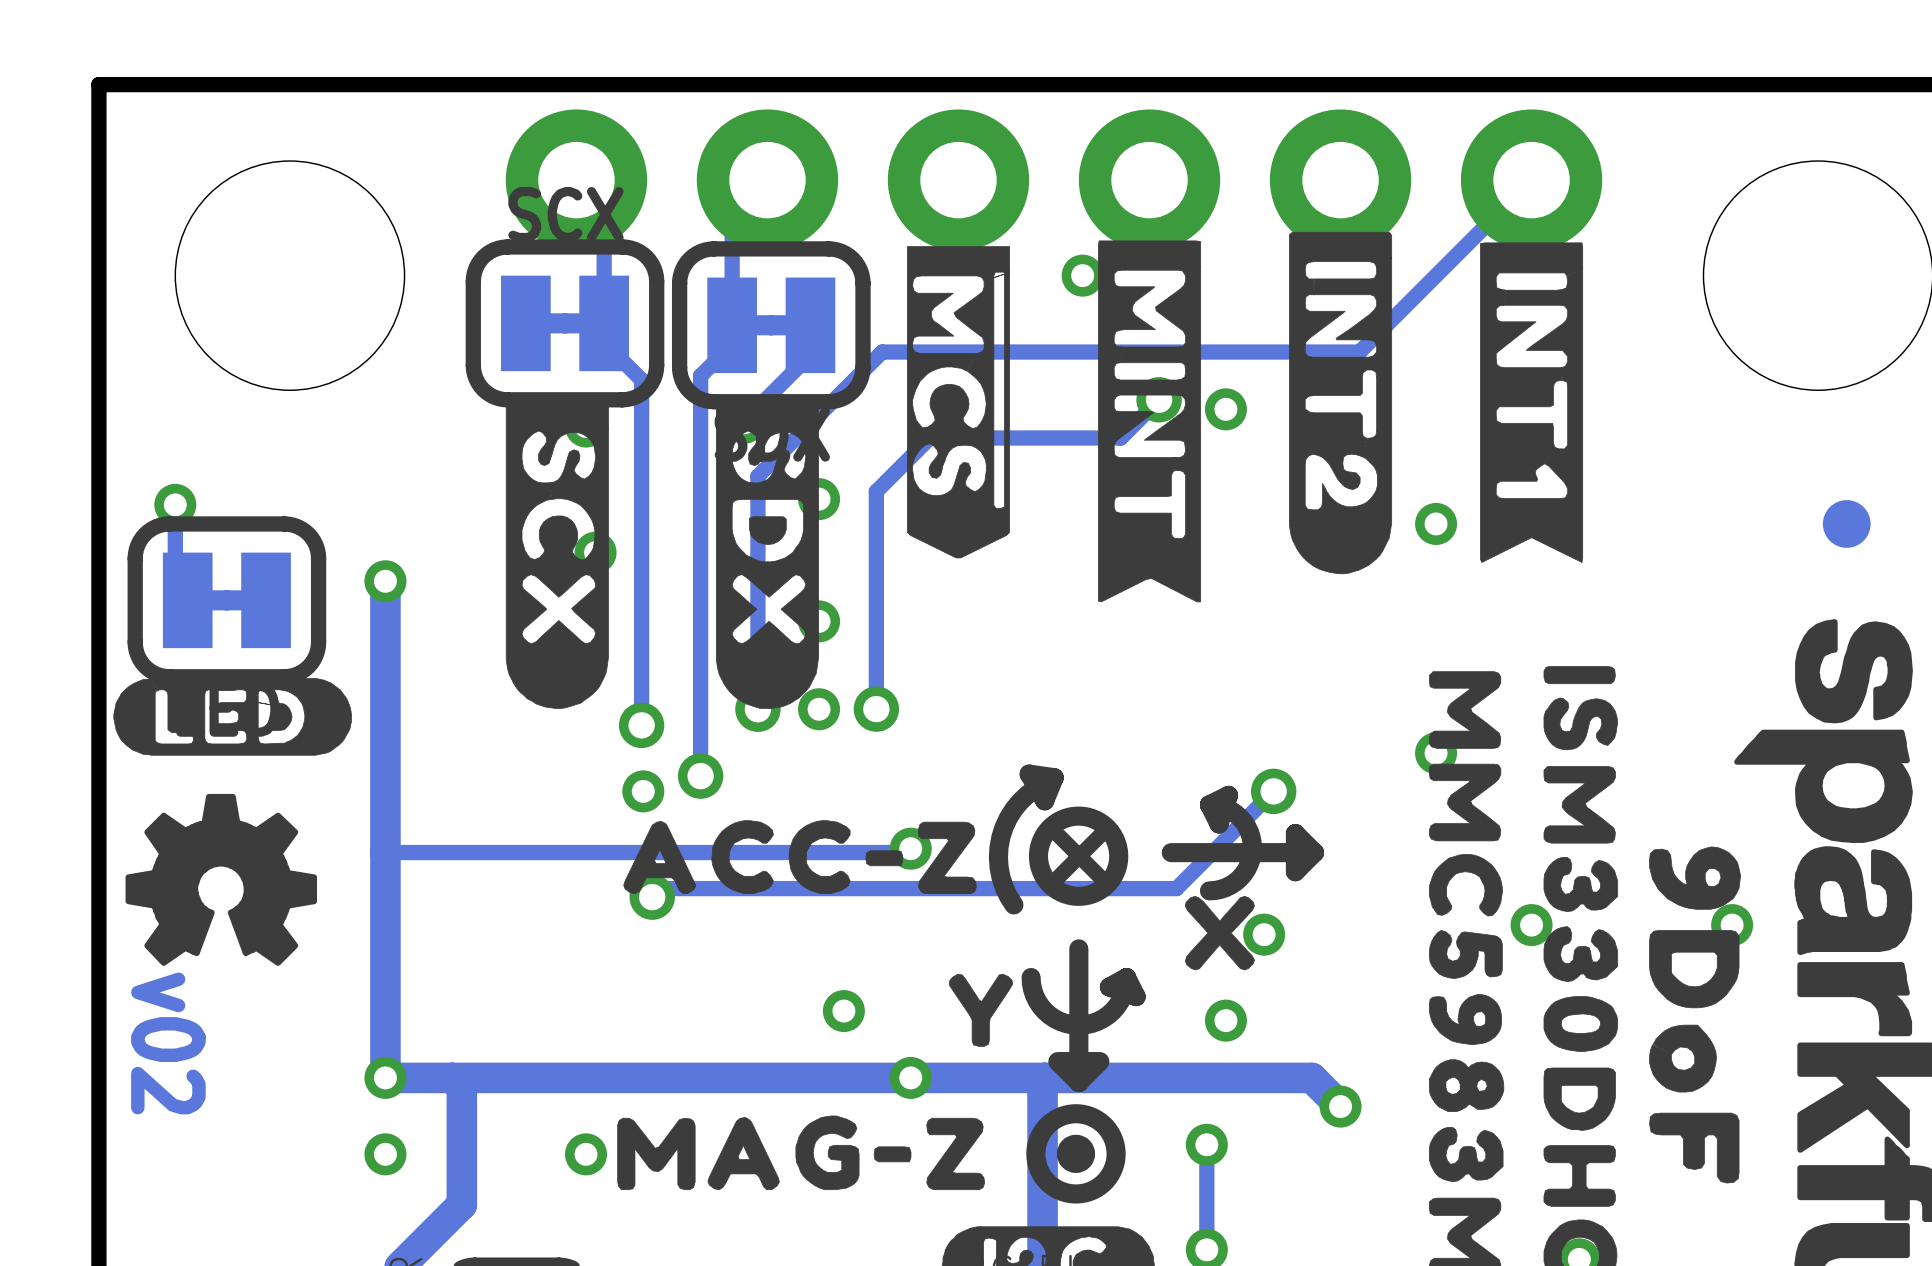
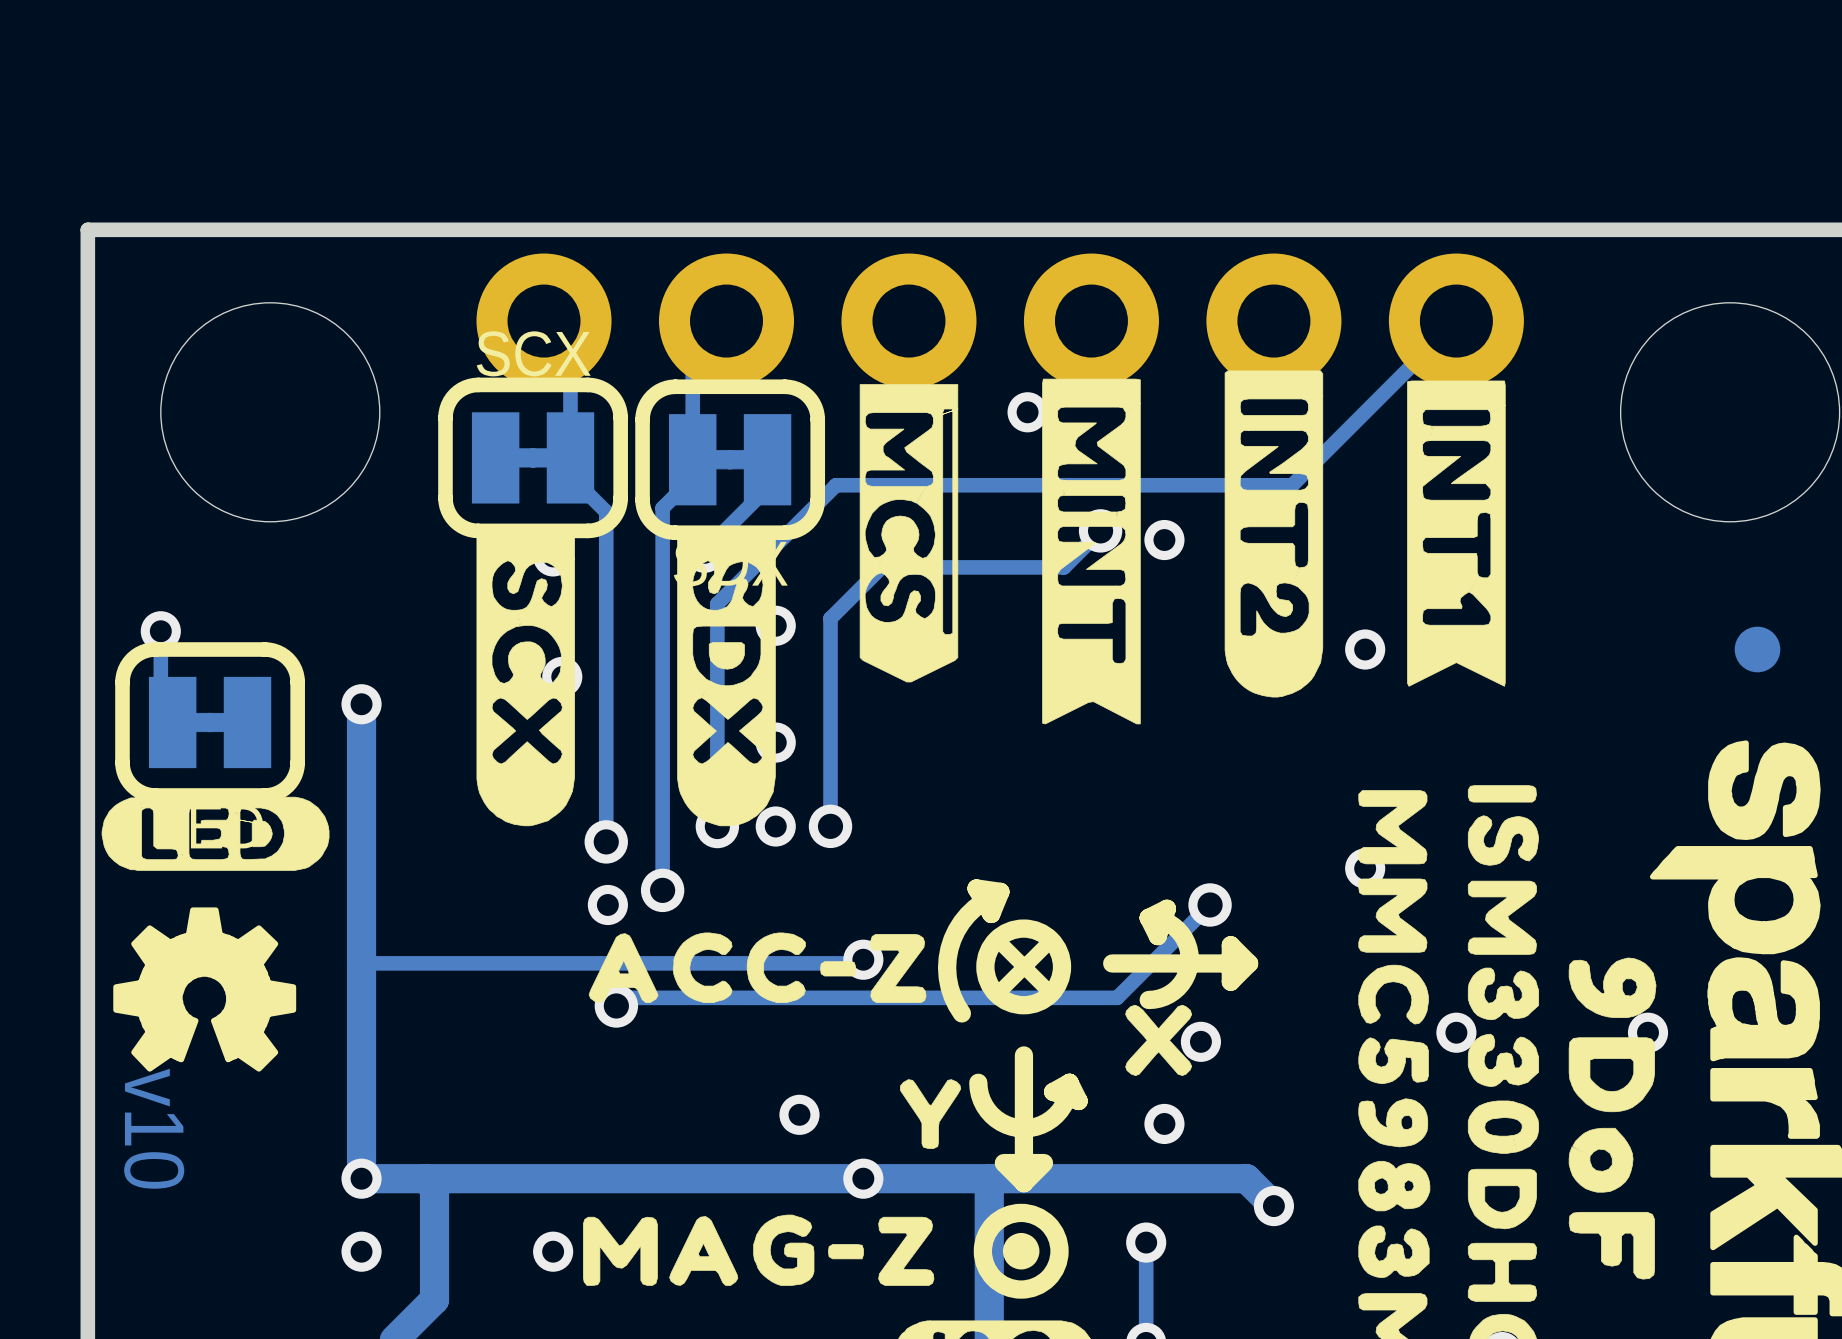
text: v02 (168, 1043) -> v10 (154, 1128)

